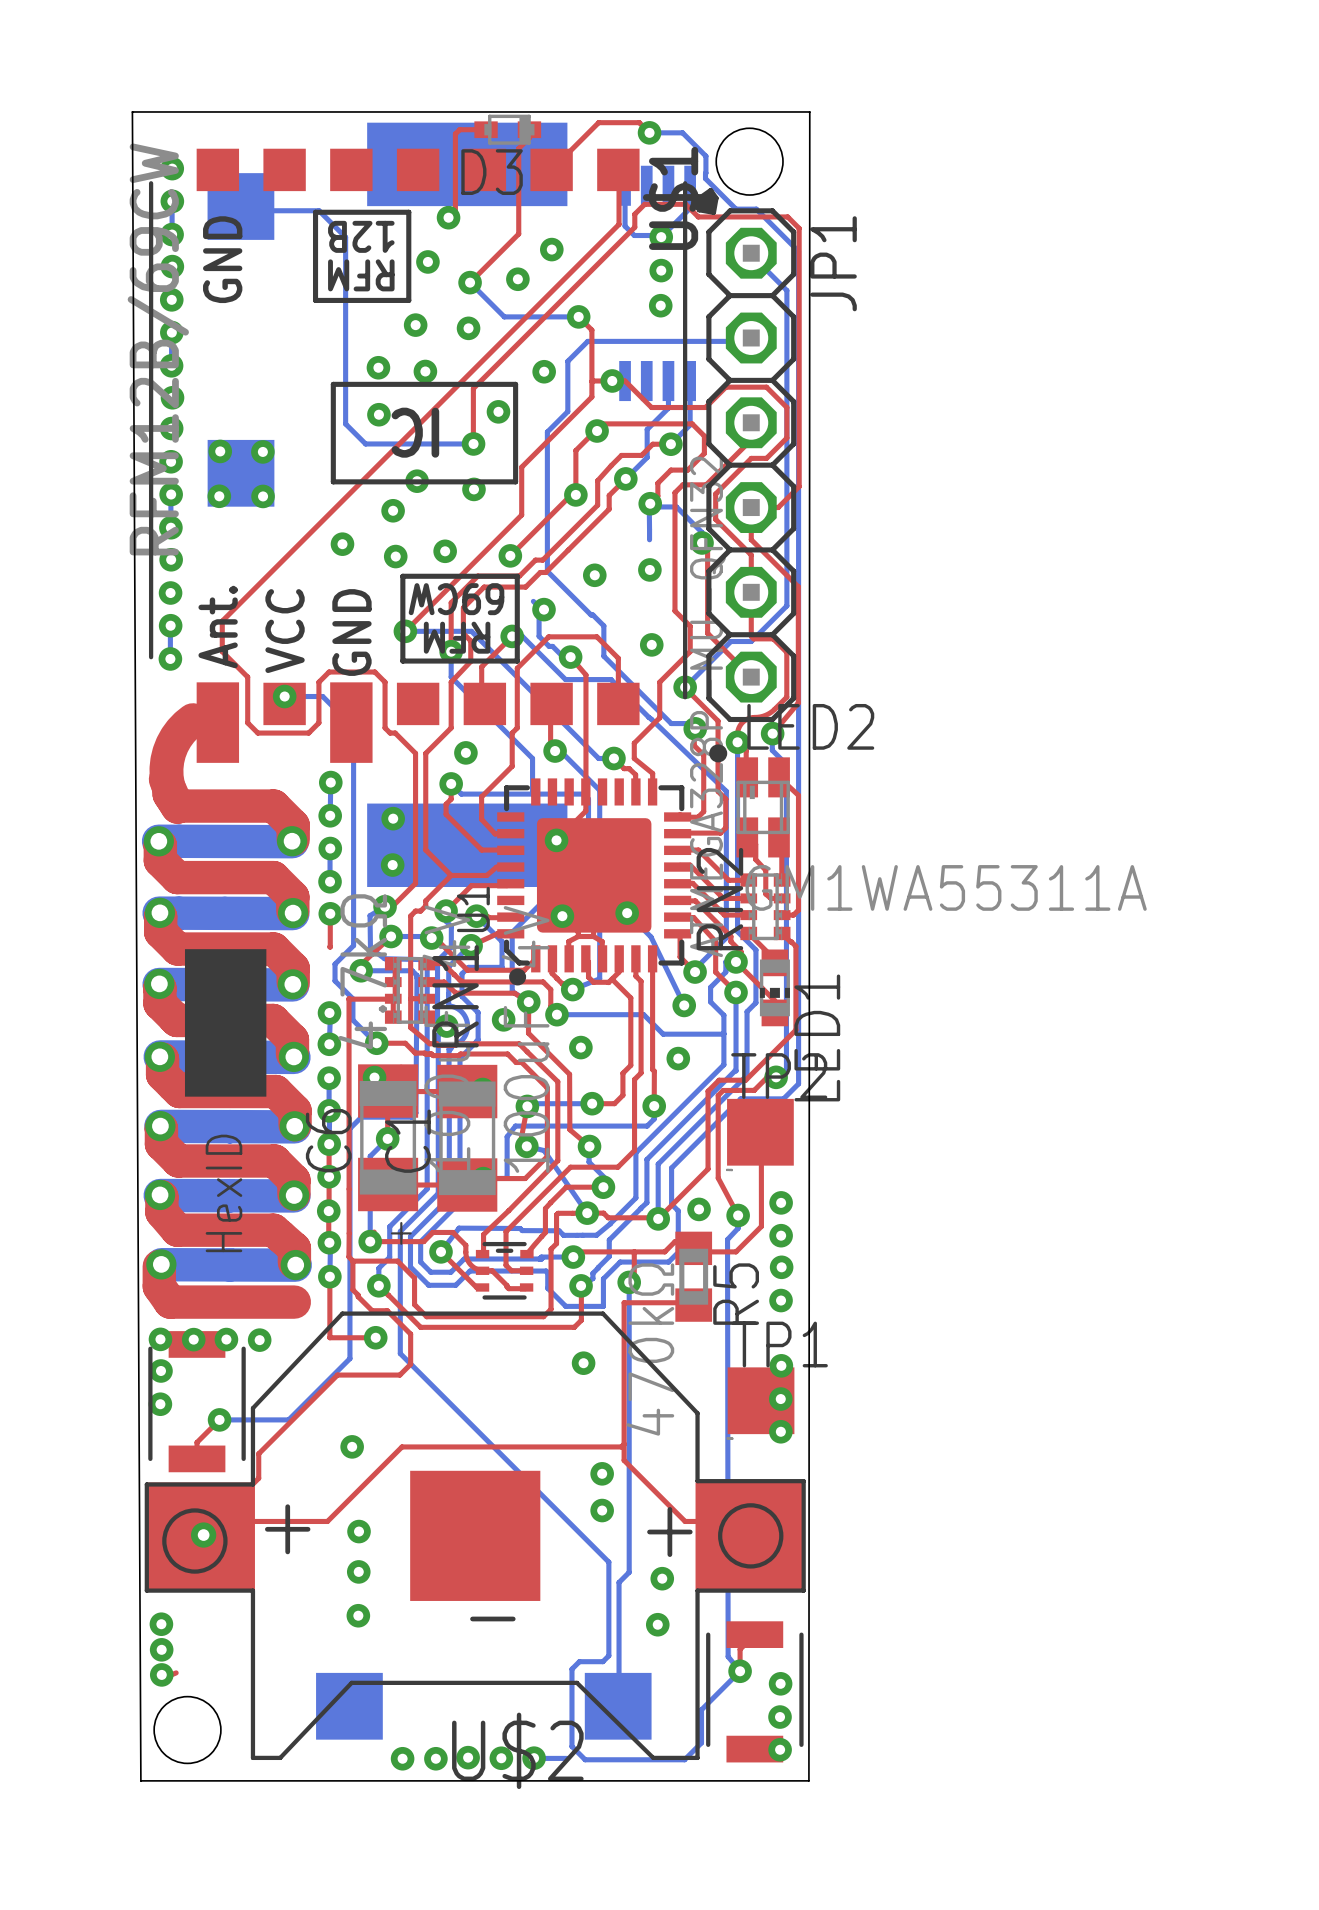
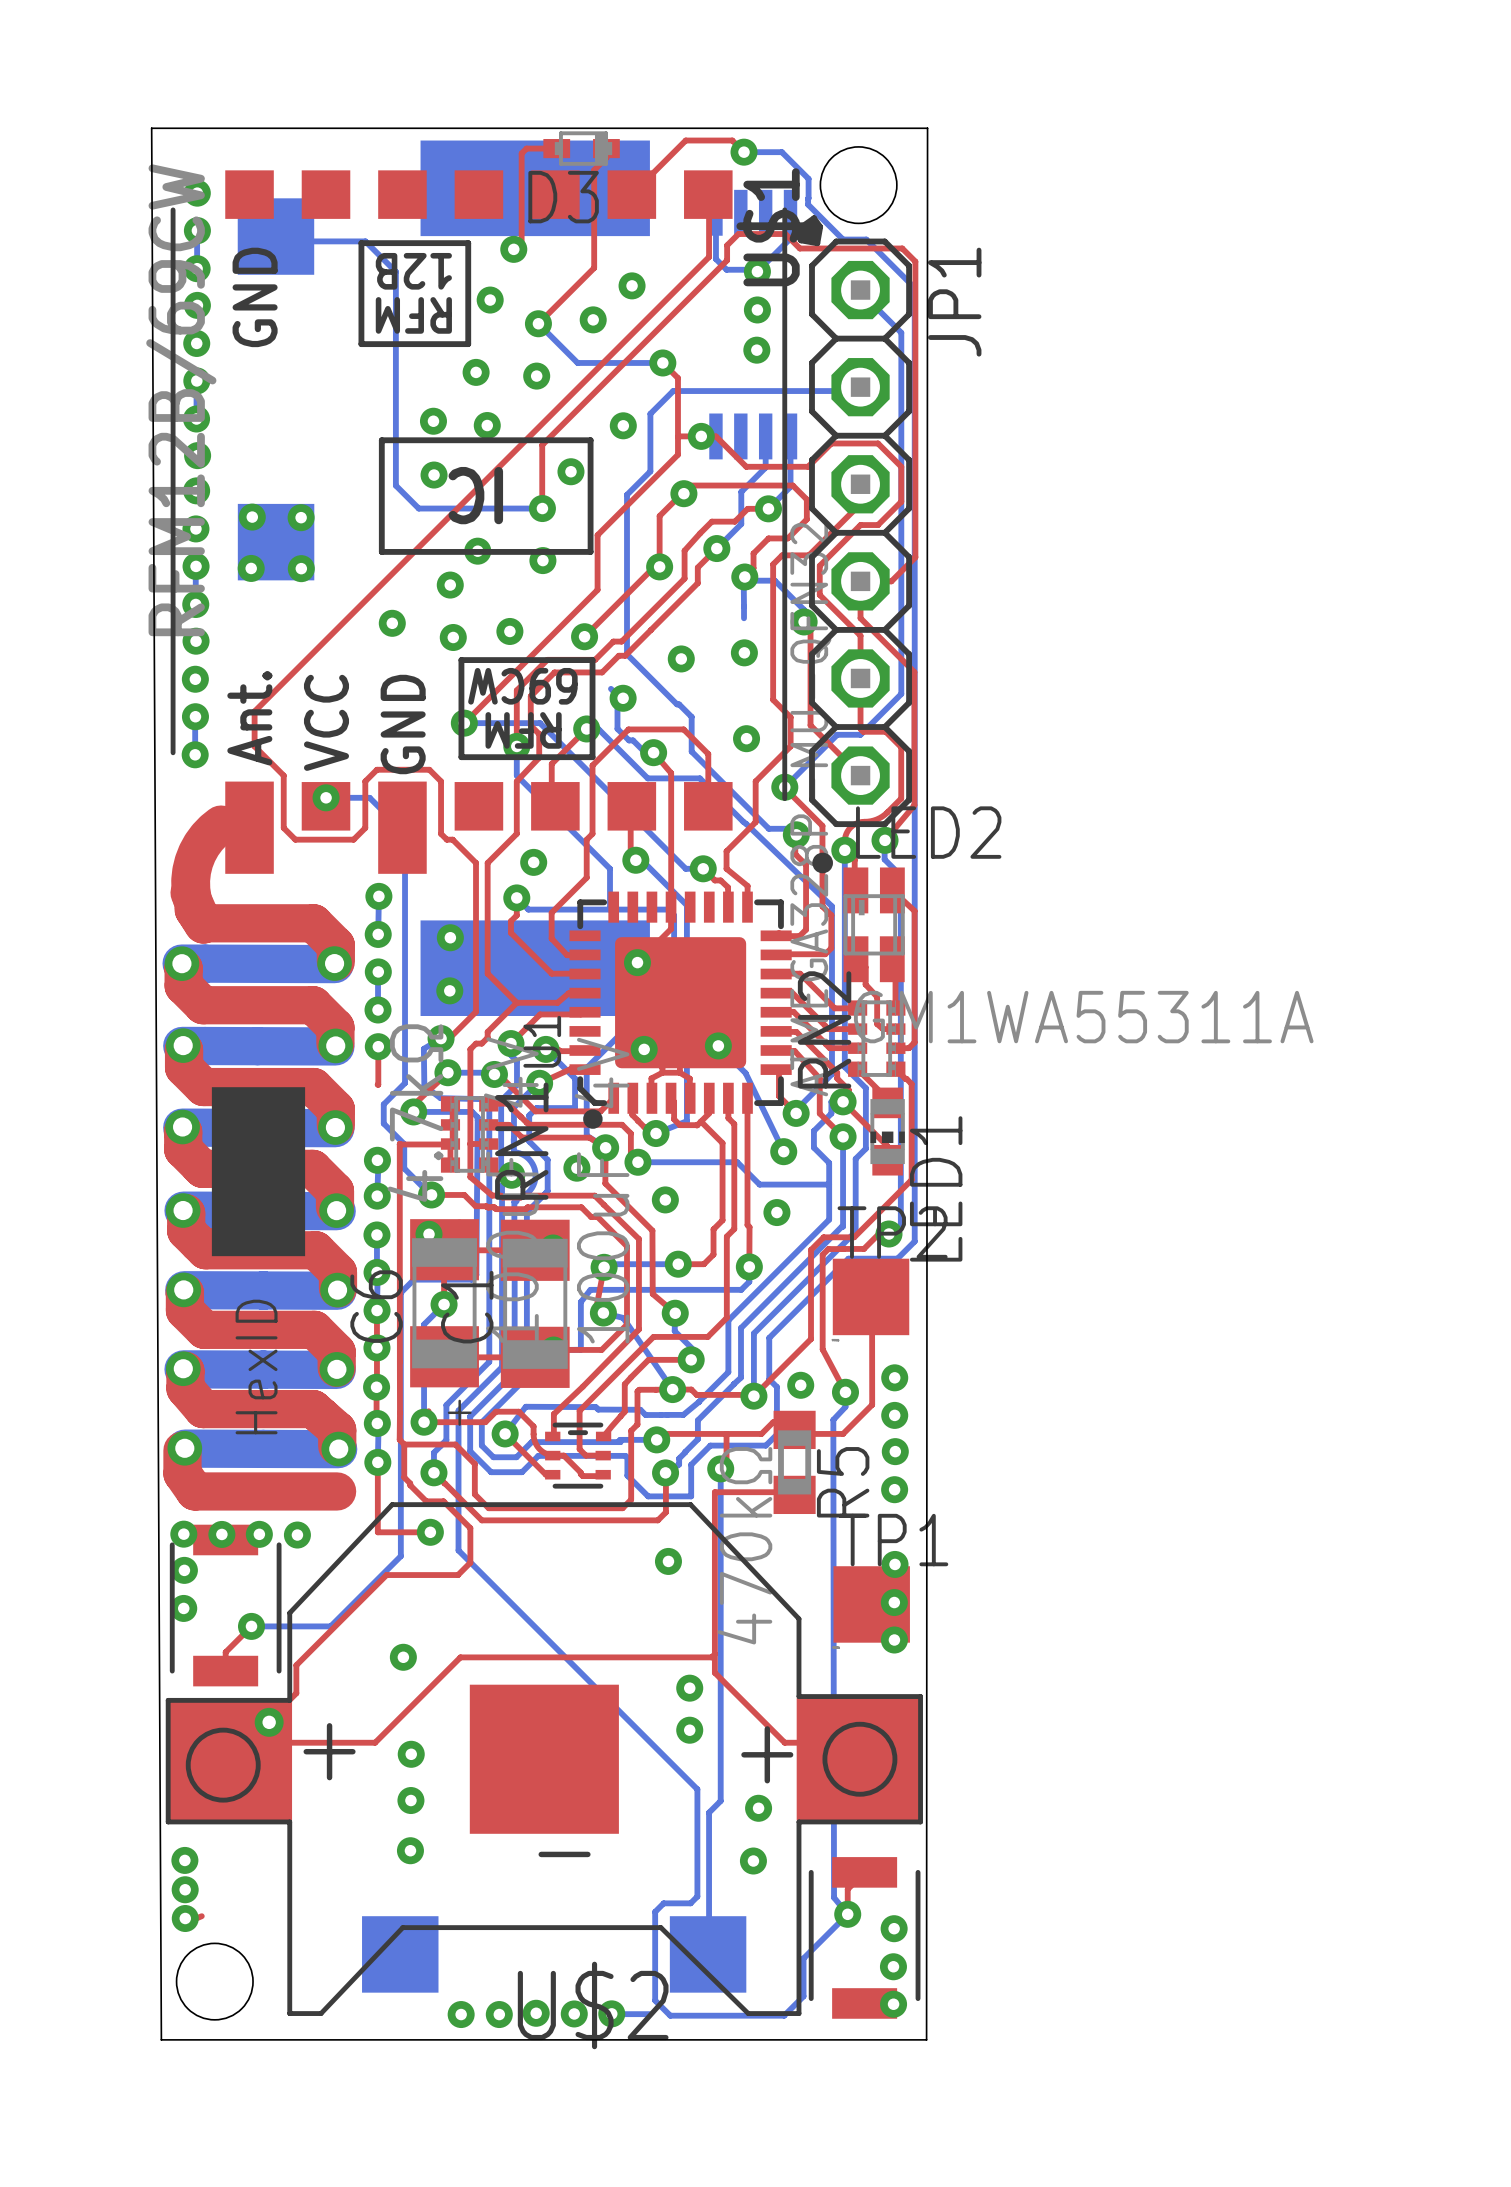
via position: (203, 1535) -> (269, 1722)

